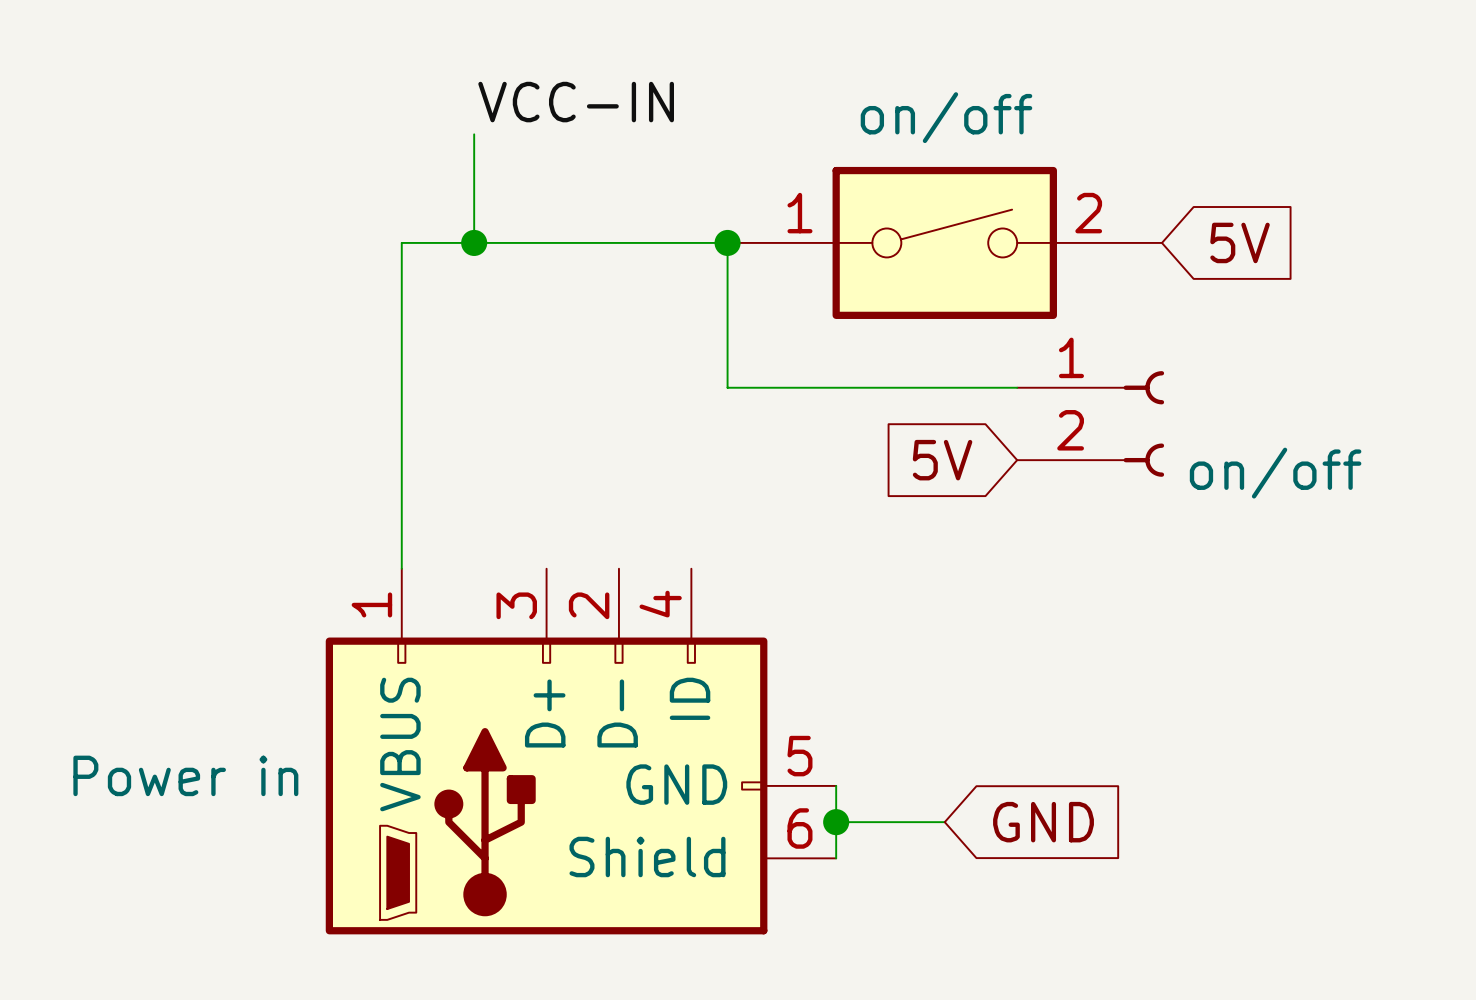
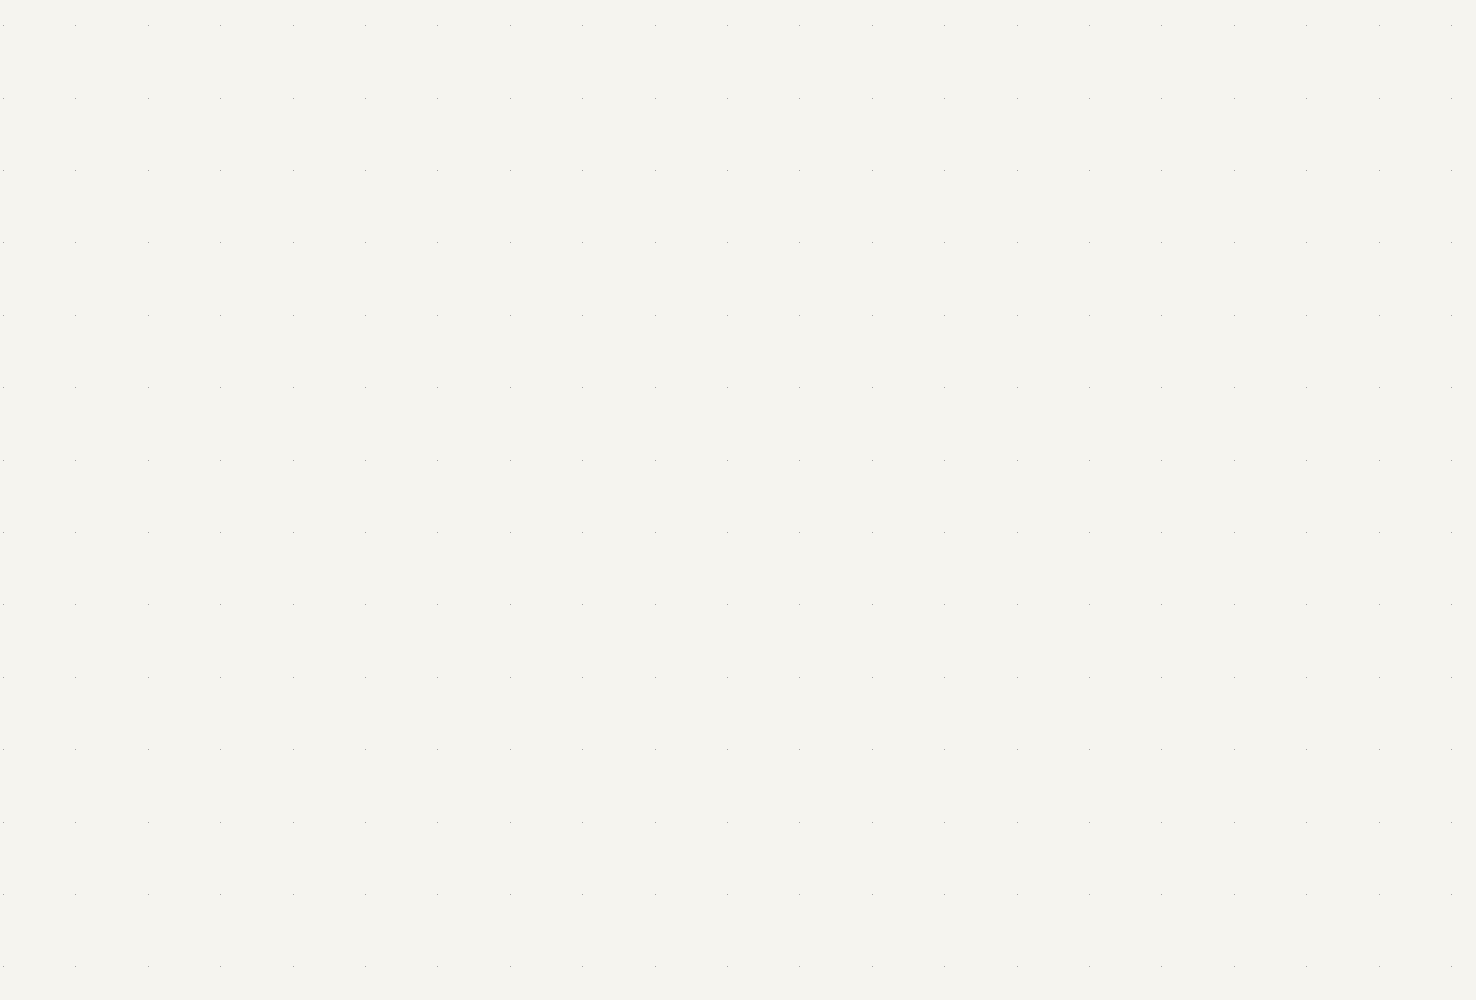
label: VCC-IN (576, 102) -> none
wire: (474, 134) (474, 242) -> none
junction: (474, 242) -> none
junction: (727, 242) -> none
part: on/off (944, 242) -> none
global label: 5V (1240, 242) -> none
wire: (1017, 387) (727, 387) (727, 242) (401, 242) (401, 568) -> none
part: on/off (1090, 423) -> none
global label: 5V (942, 460) -> none
part: Power in (580, 751) -> none
wire: (836, 785) (836, 858) -> none
wire: (836, 822) (944, 822) -> none
junction: (836, 822) -> none
global label: GND (1043, 822) -> none

